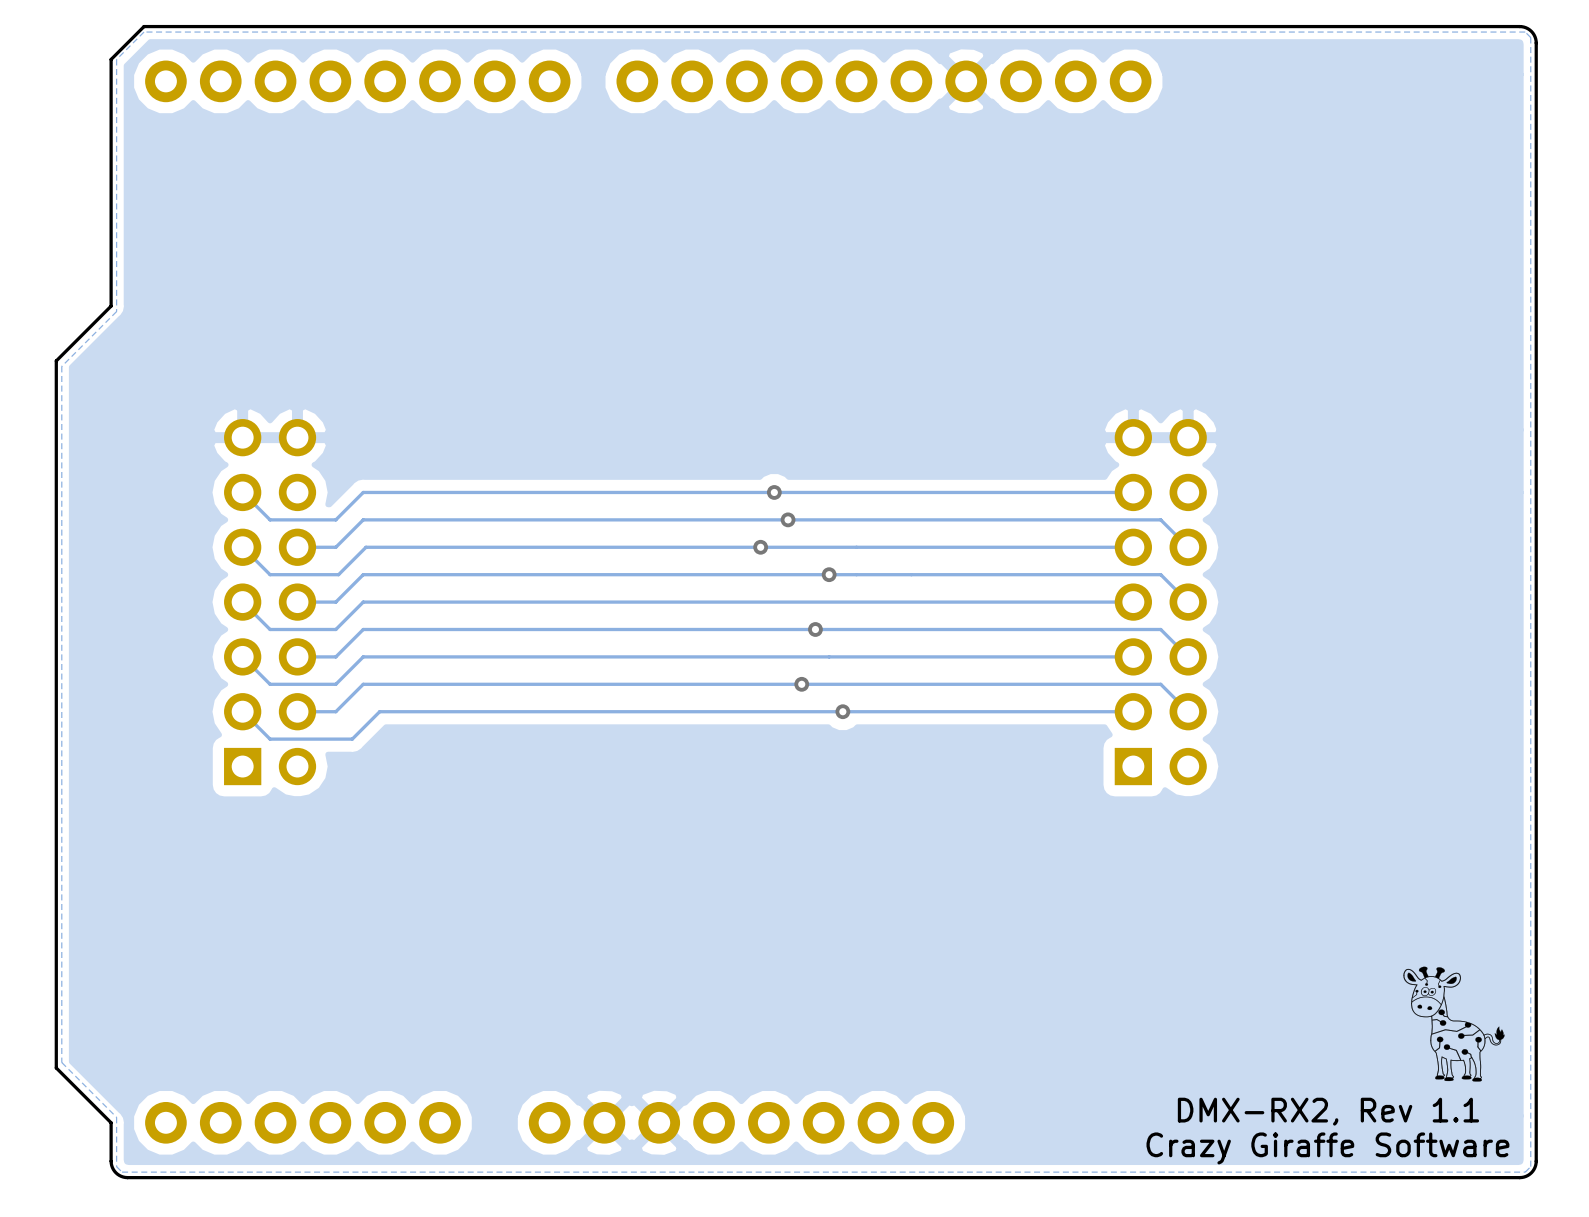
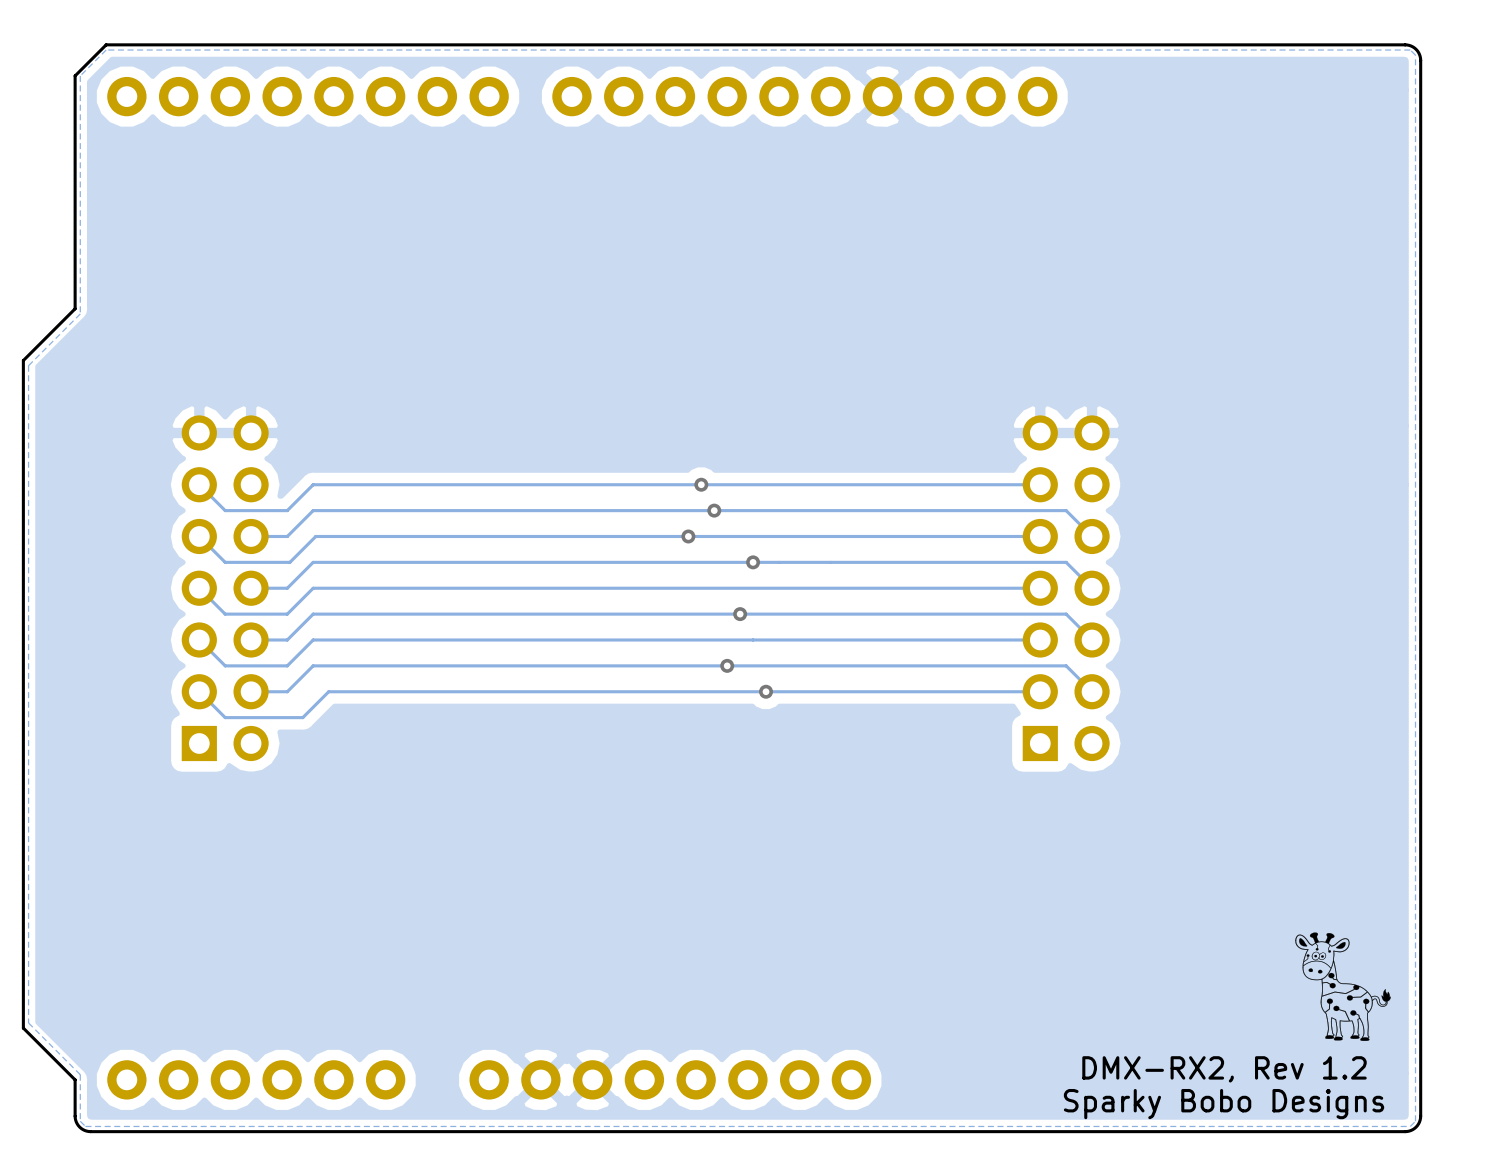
text: DMX-RX2, Rev 1.1 (1328, 1111) -> DMX-RX2, Rev 1.2 (1224, 1069)
text: Crazy Giraffe Software (1327, 1148) -> Sparky Bobo Designs (1224, 1104)

